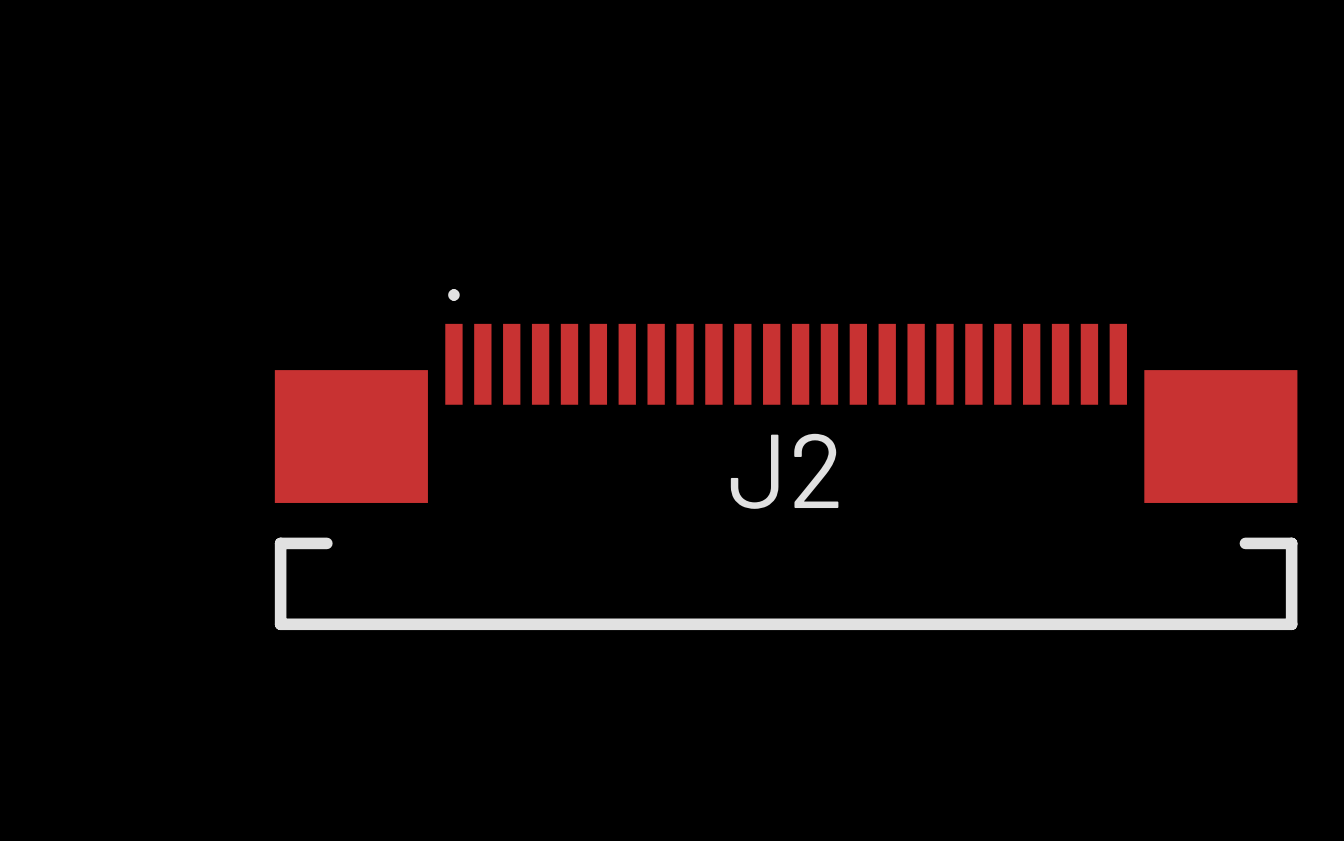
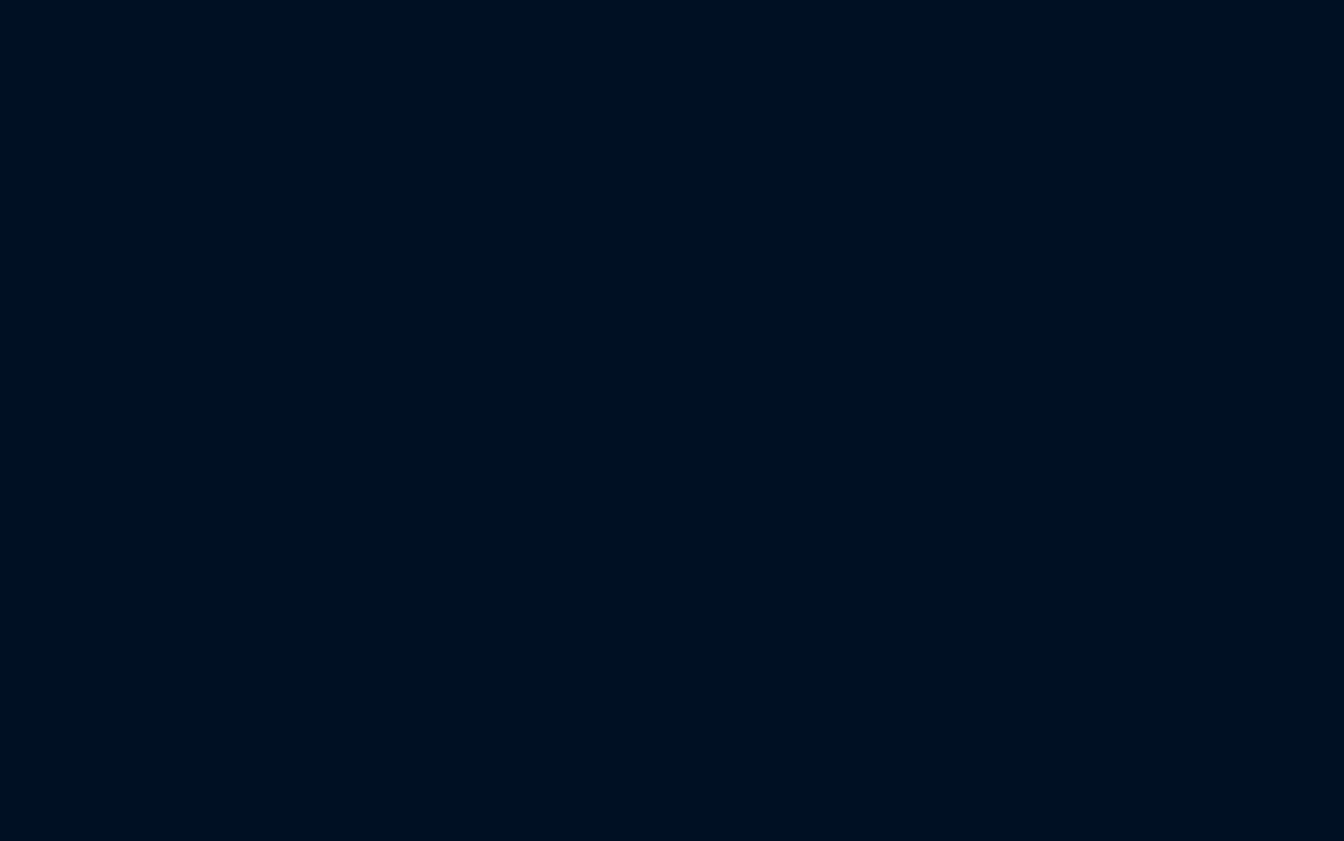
J2: (786, 459) -> none

